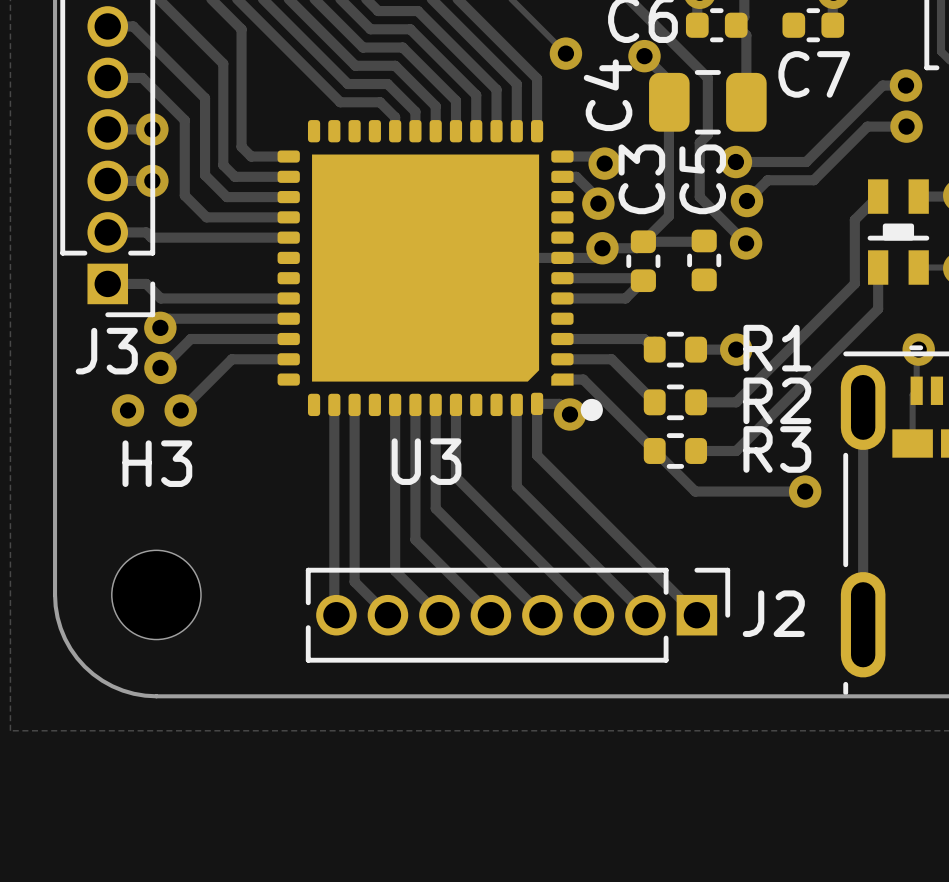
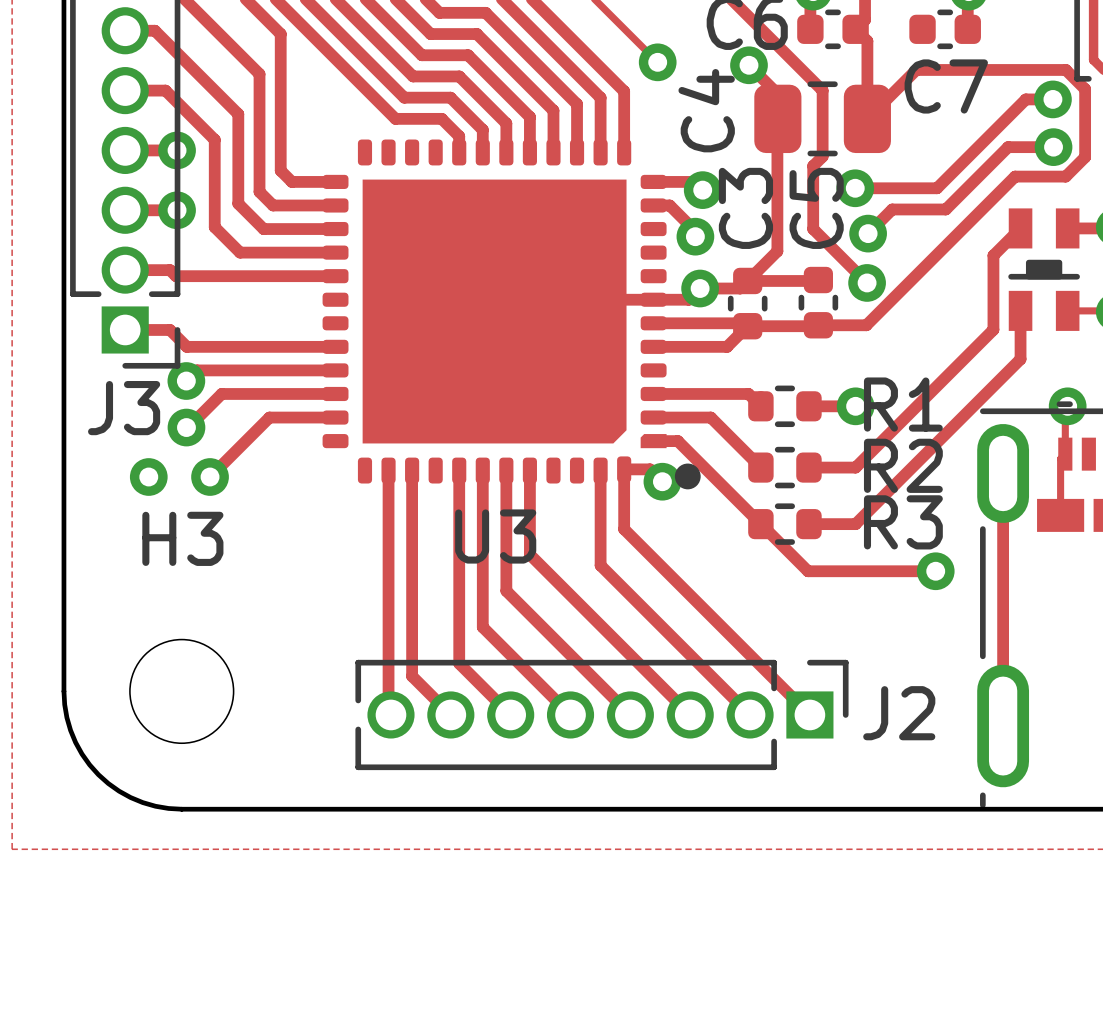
track: none -> (867, 118) (916, 69) (1065, 69) (1085, 89) (1085, 157) (1065, 176) (1015, 176) (866, 325) (747, 326)

